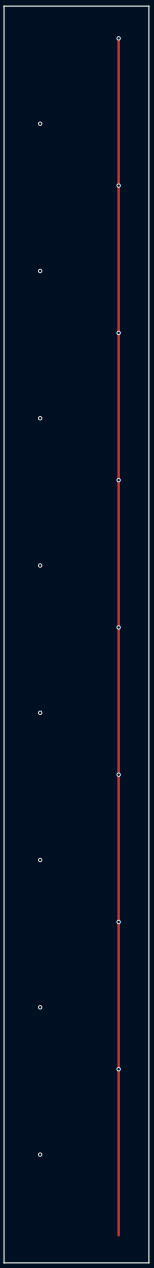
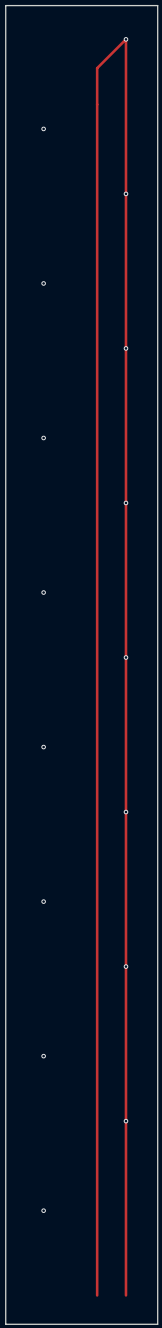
track: none -> (125, 39) (97, 68) (97, 1295)

